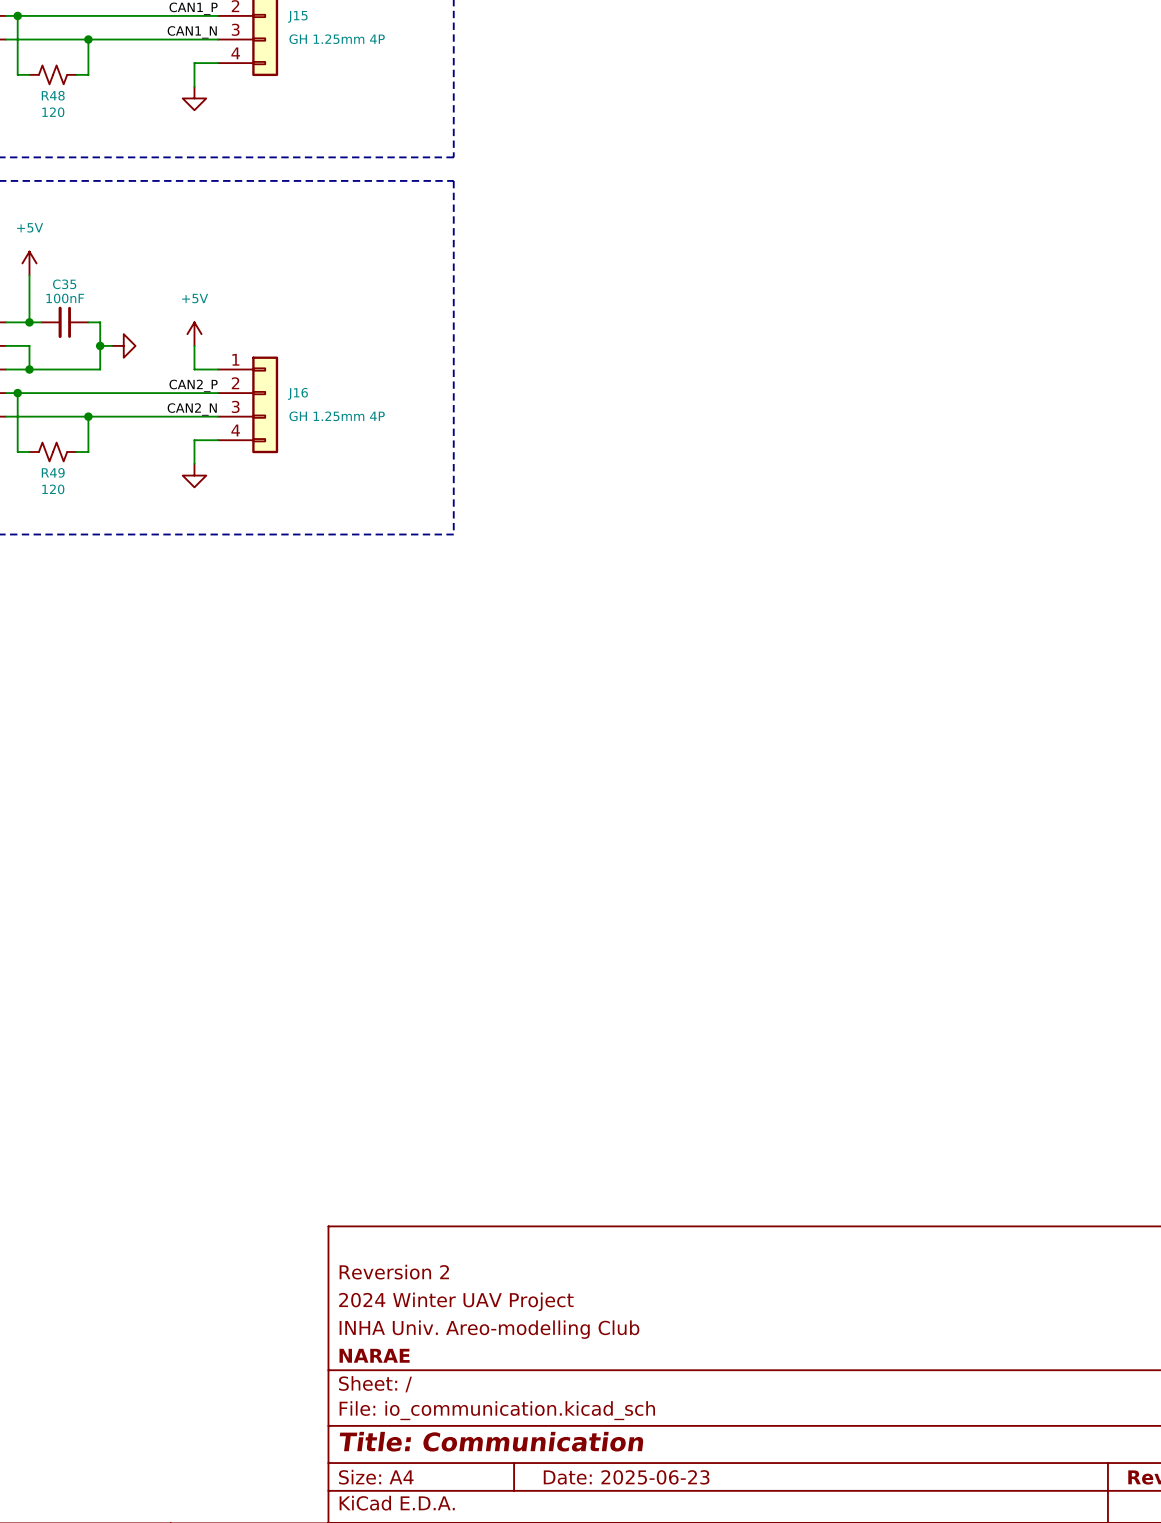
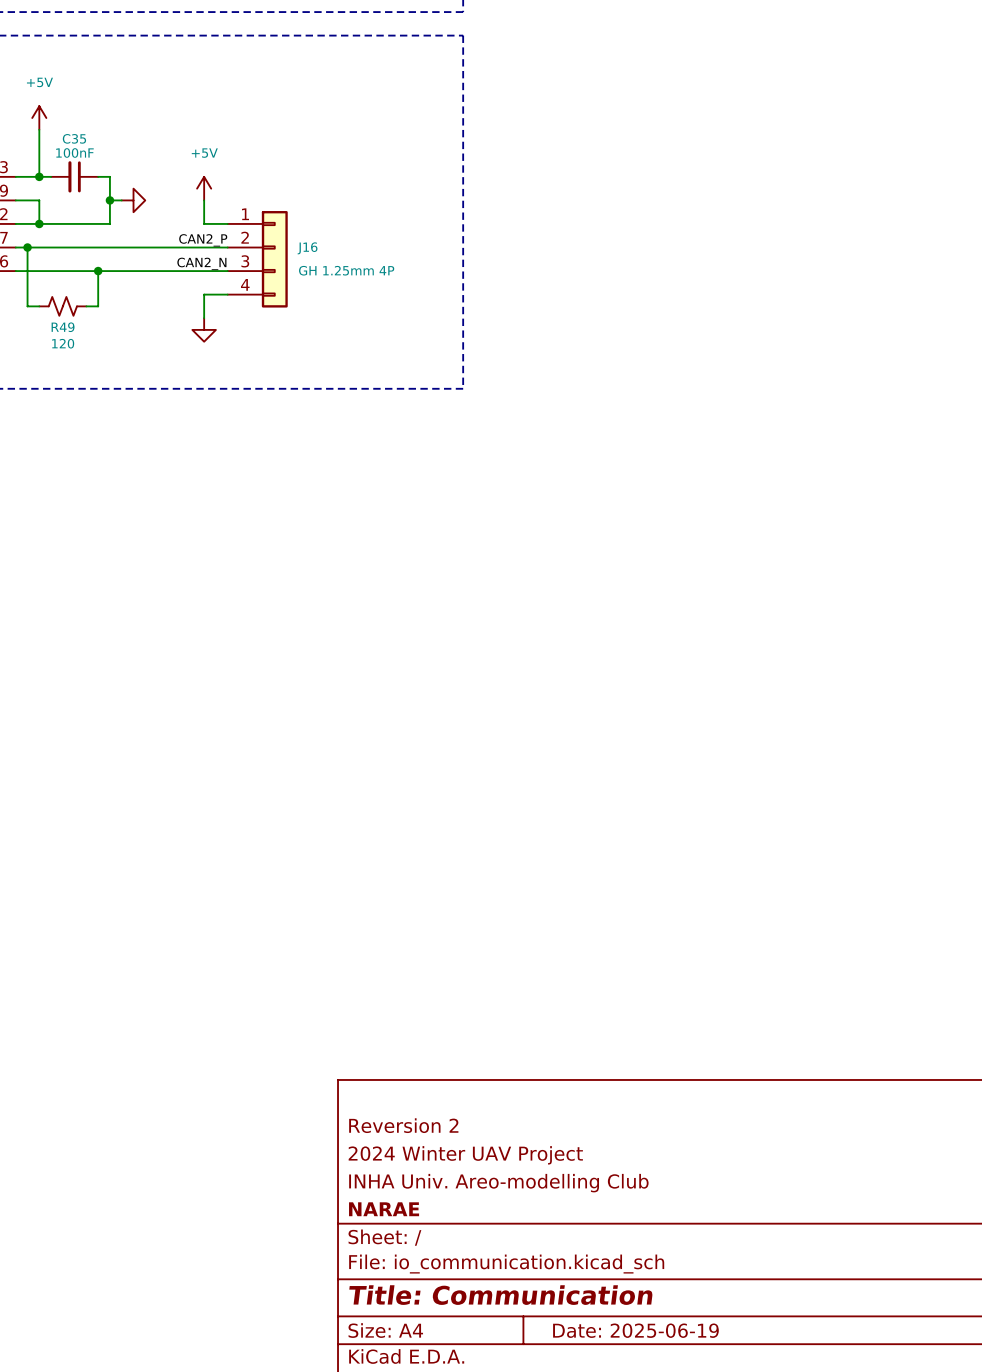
title block: Date: 2025-06-23 (626, 1477) -> Date: 2025-06-19 (635, 1330)

